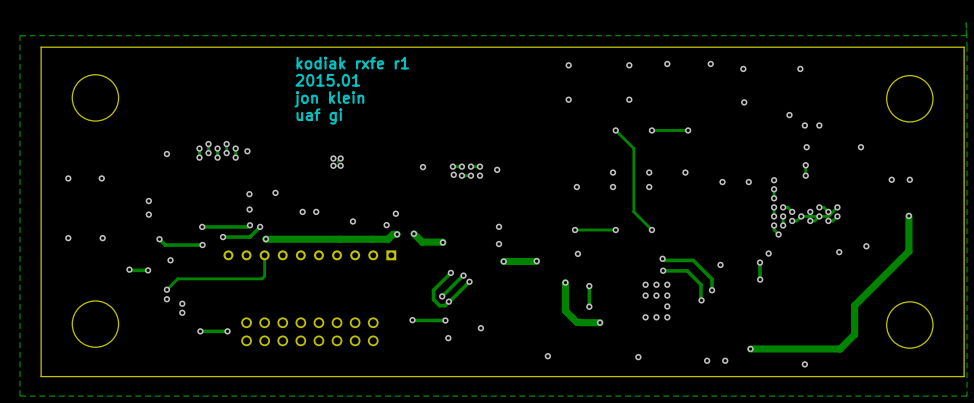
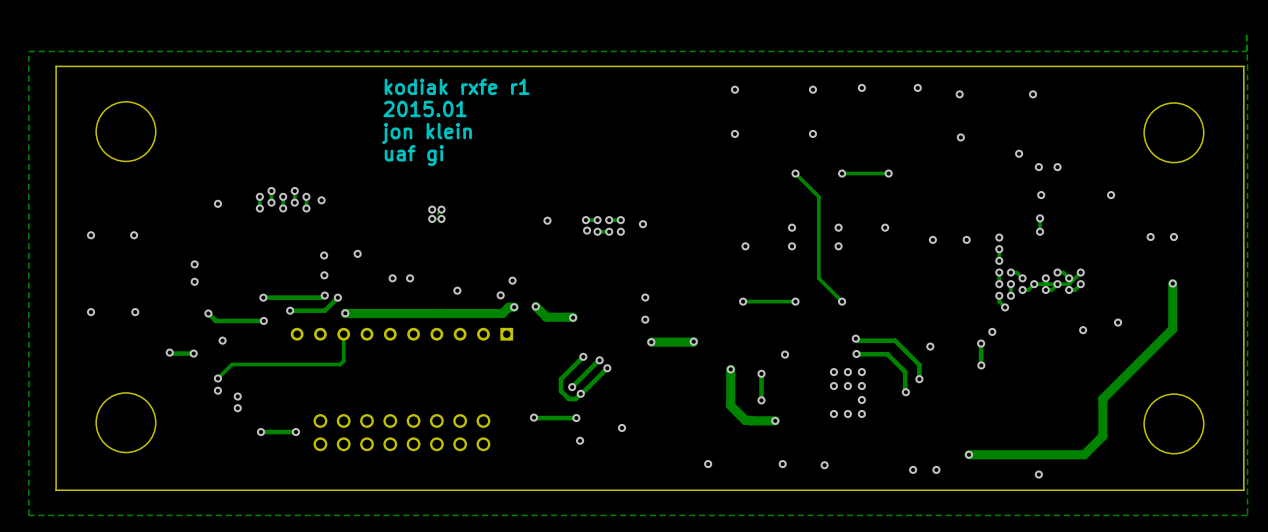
via position: (577, 253) -> (785, 354)
via: none -> (782, 464)

